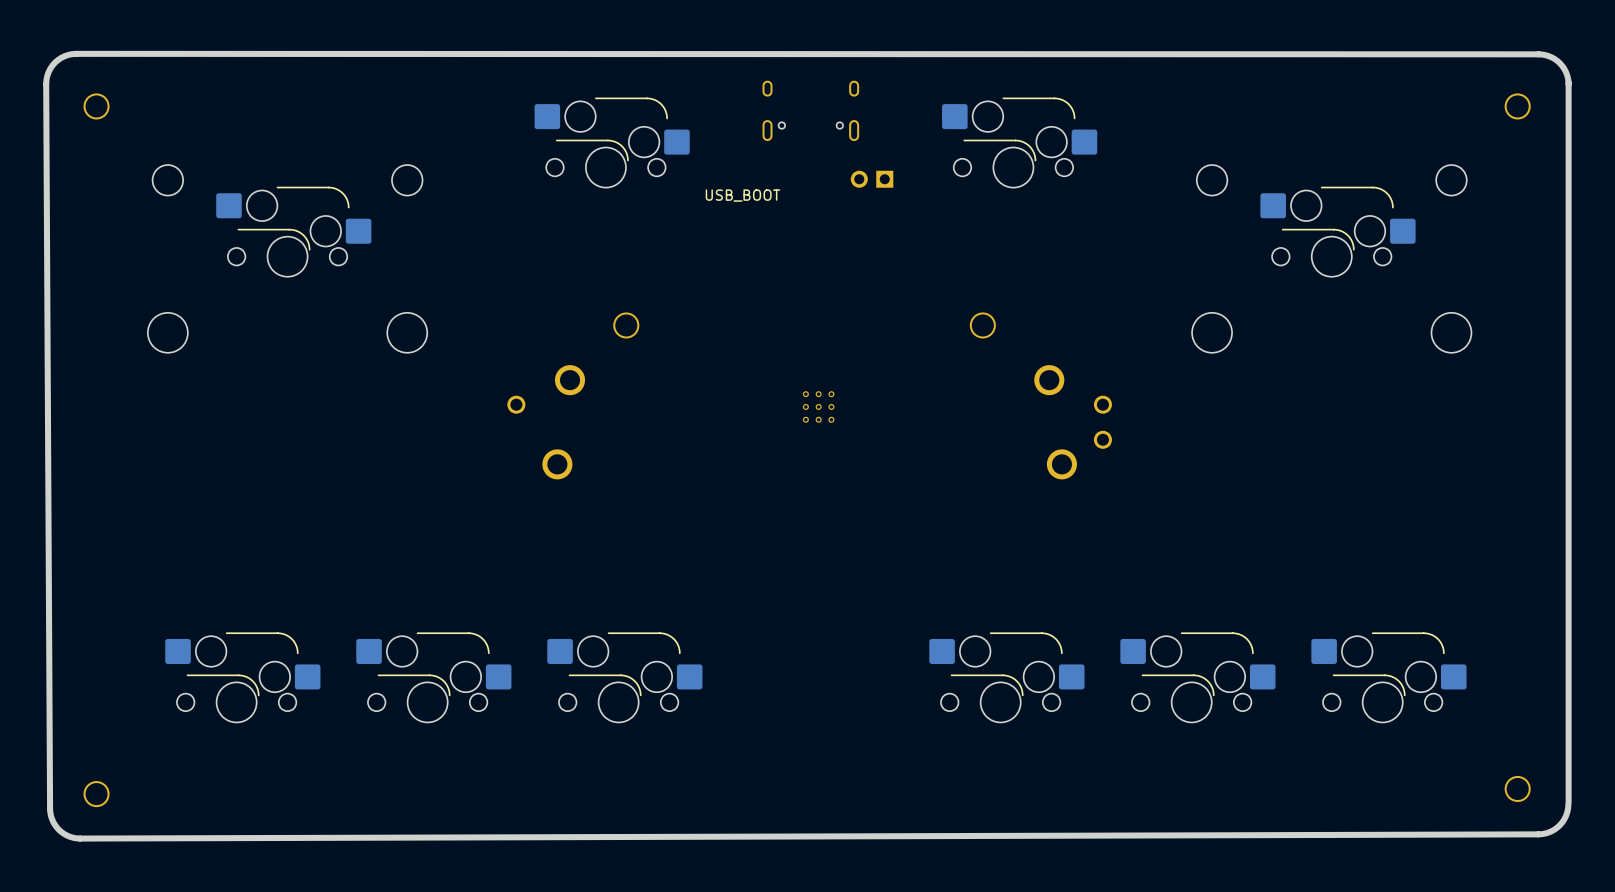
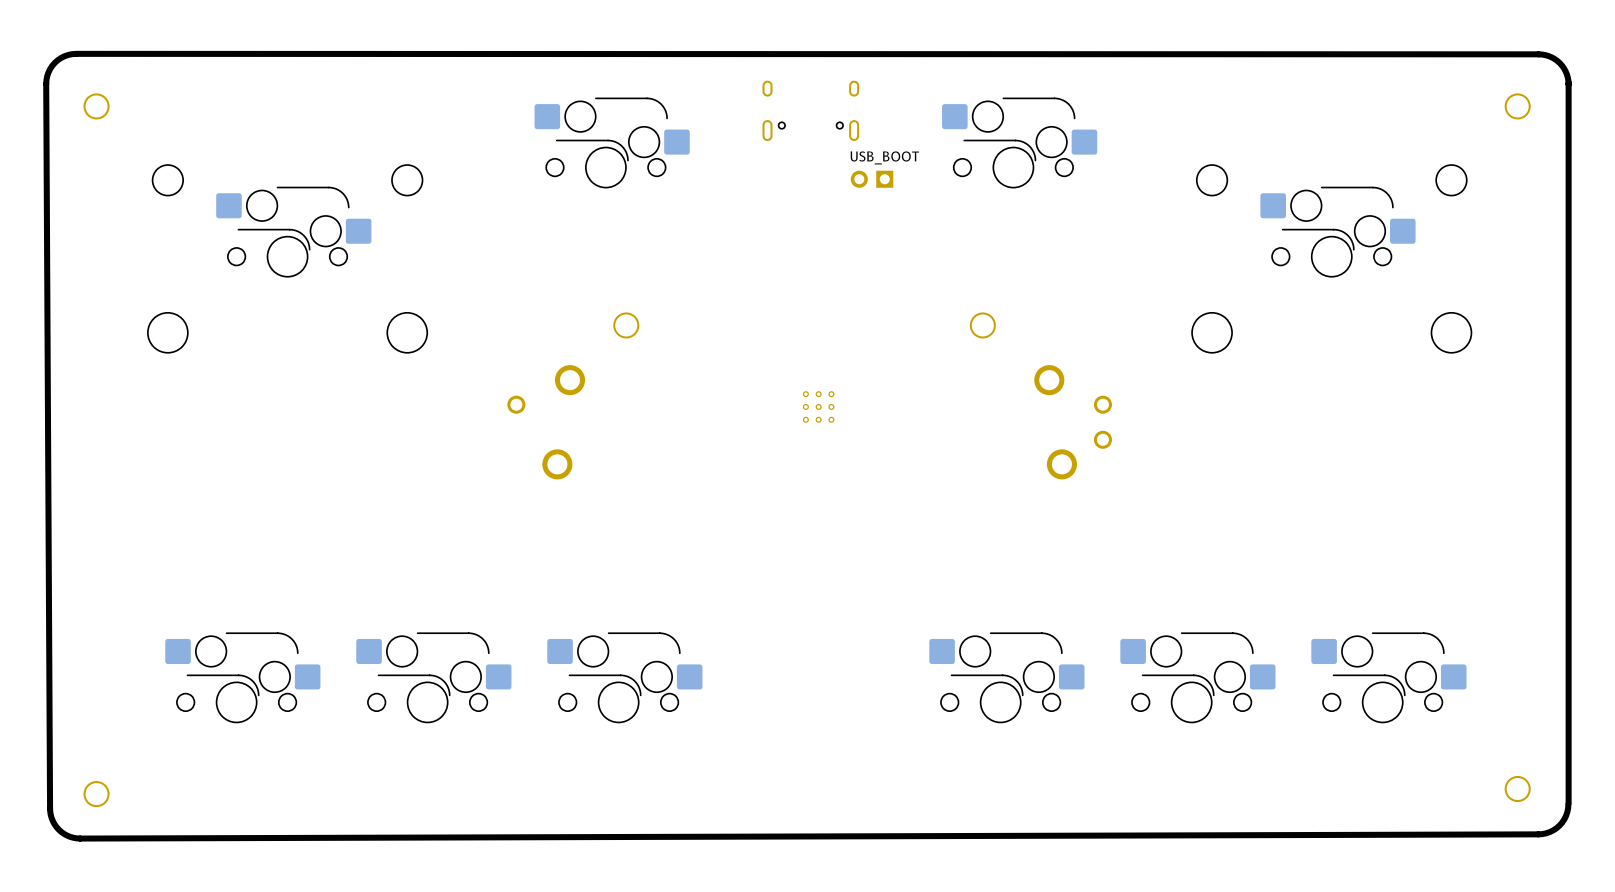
text position: USB_BOOT (742, 195) -> USB_BOOT (884, 157)

